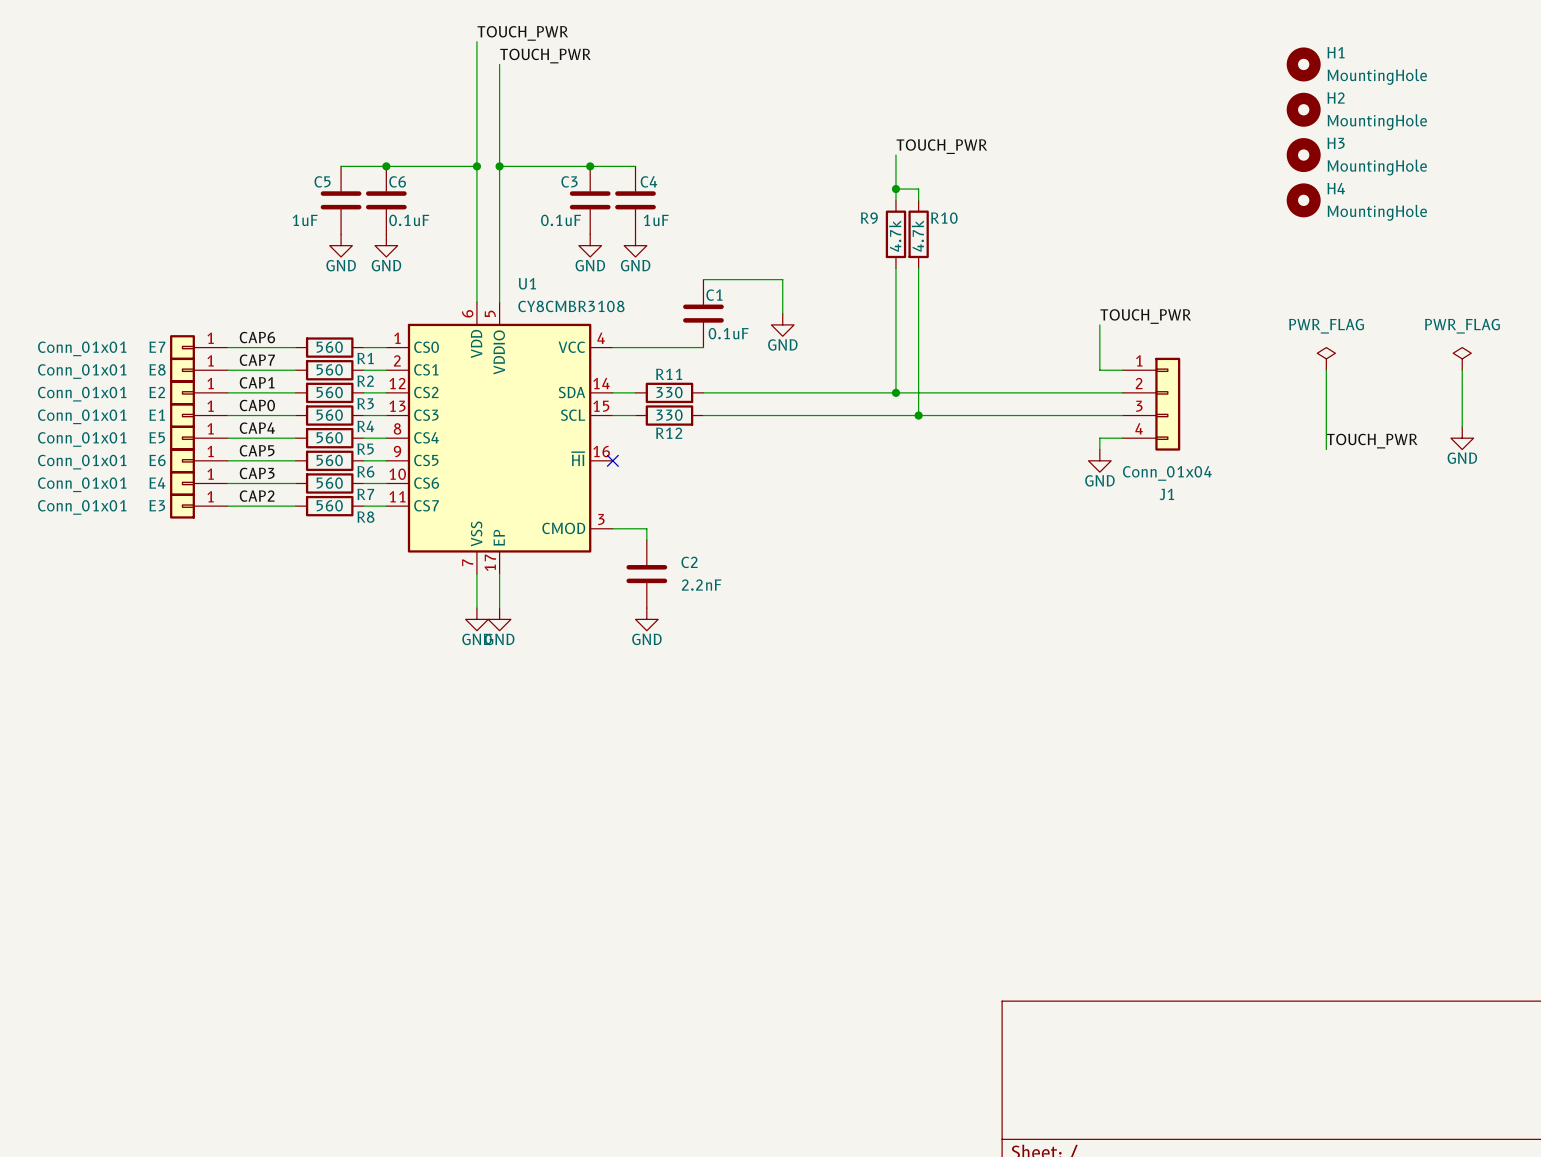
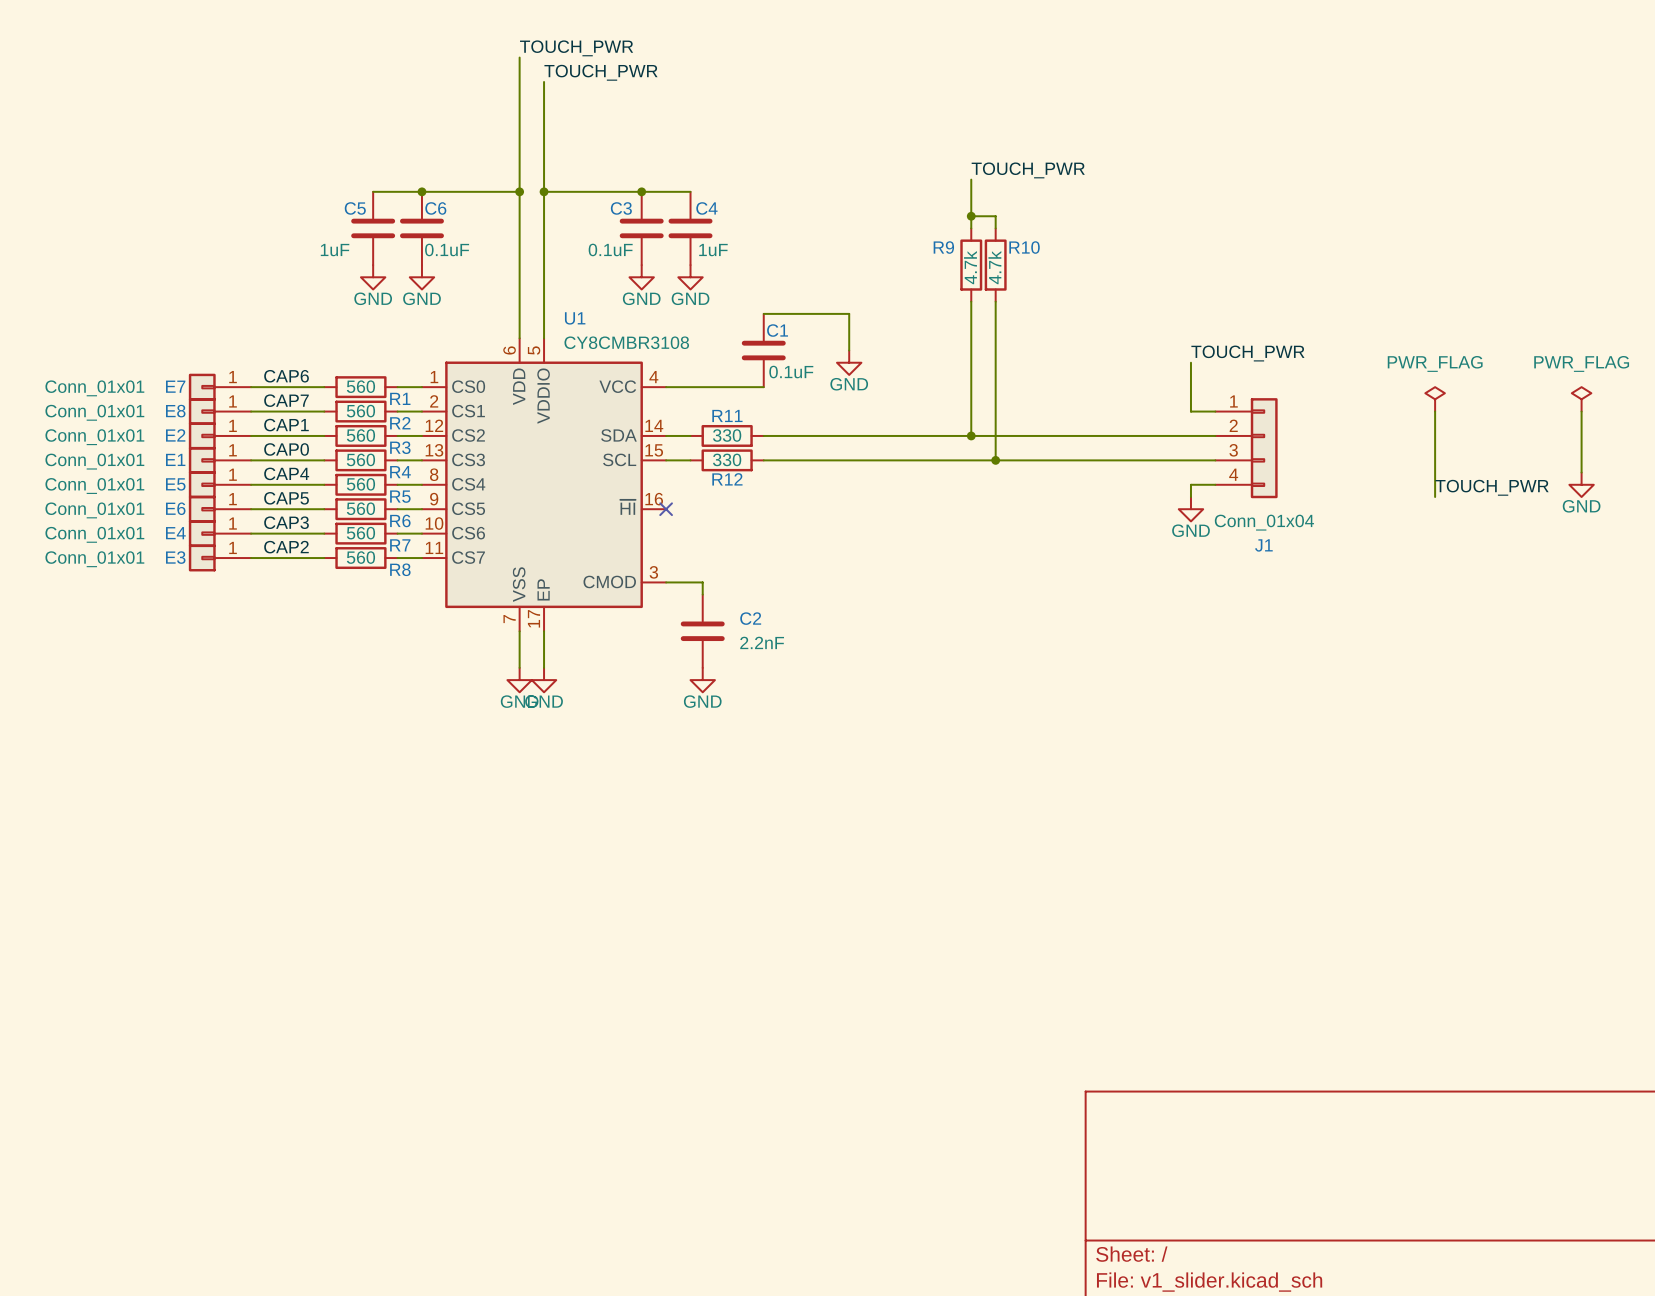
H1: MountingHole (1303, 64) -> none
H2: MountingHole (1303, 109) -> none
H3: MountingHole (1303, 155) -> none
H4: MountingHole (1303, 200) -> none

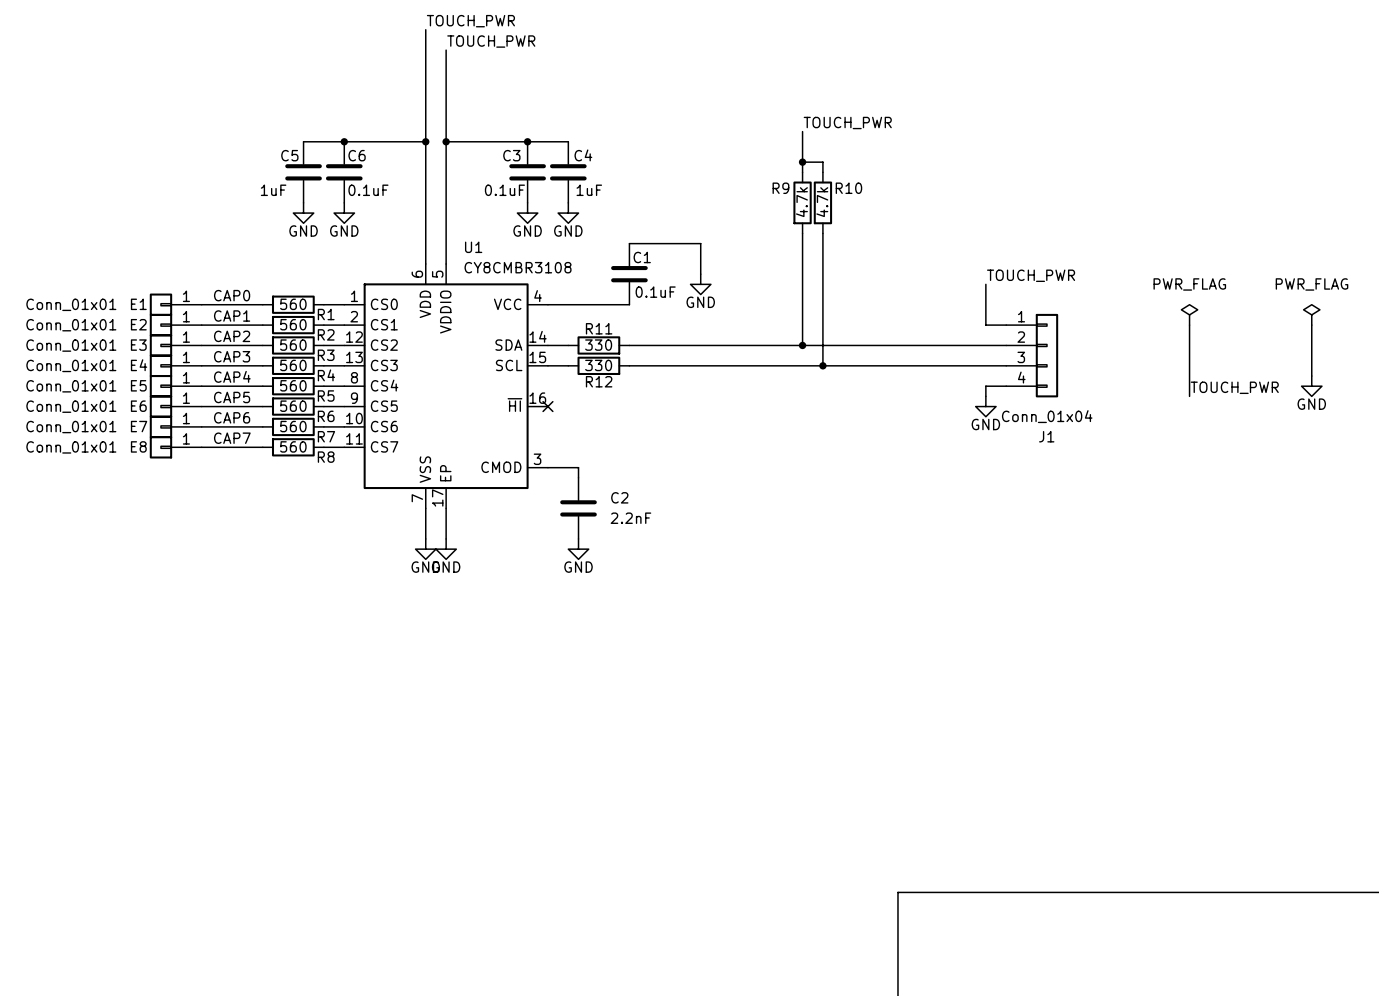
label: CAP6 (286, 376) -> CAP0 (232, 295)
E7 name: E7 (175, 386) -> E1 (138, 304)
label: CAP7 (286, 400) -> CAP1 (232, 316)
E8 name: E8 (175, 411) -> E2 (138, 324)
label: CAP1 (286, 425) -> CAP2 (232, 336)
E2 name: E2 (175, 435) -> E3 (138, 345)
label: CAP0 (286, 449) -> CAP3 (232, 356)
E1 name: E1 (175, 459) -> E4 (139, 365)
label: CAP3 (286, 522) -> CAP6 (232, 417)
E4 name: E4 (175, 533) -> E7 (139, 426)
label: CAP2 (286, 547) -> CAP7 (232, 438)
E3 name: E3 (175, 557) -> E8 (138, 446)

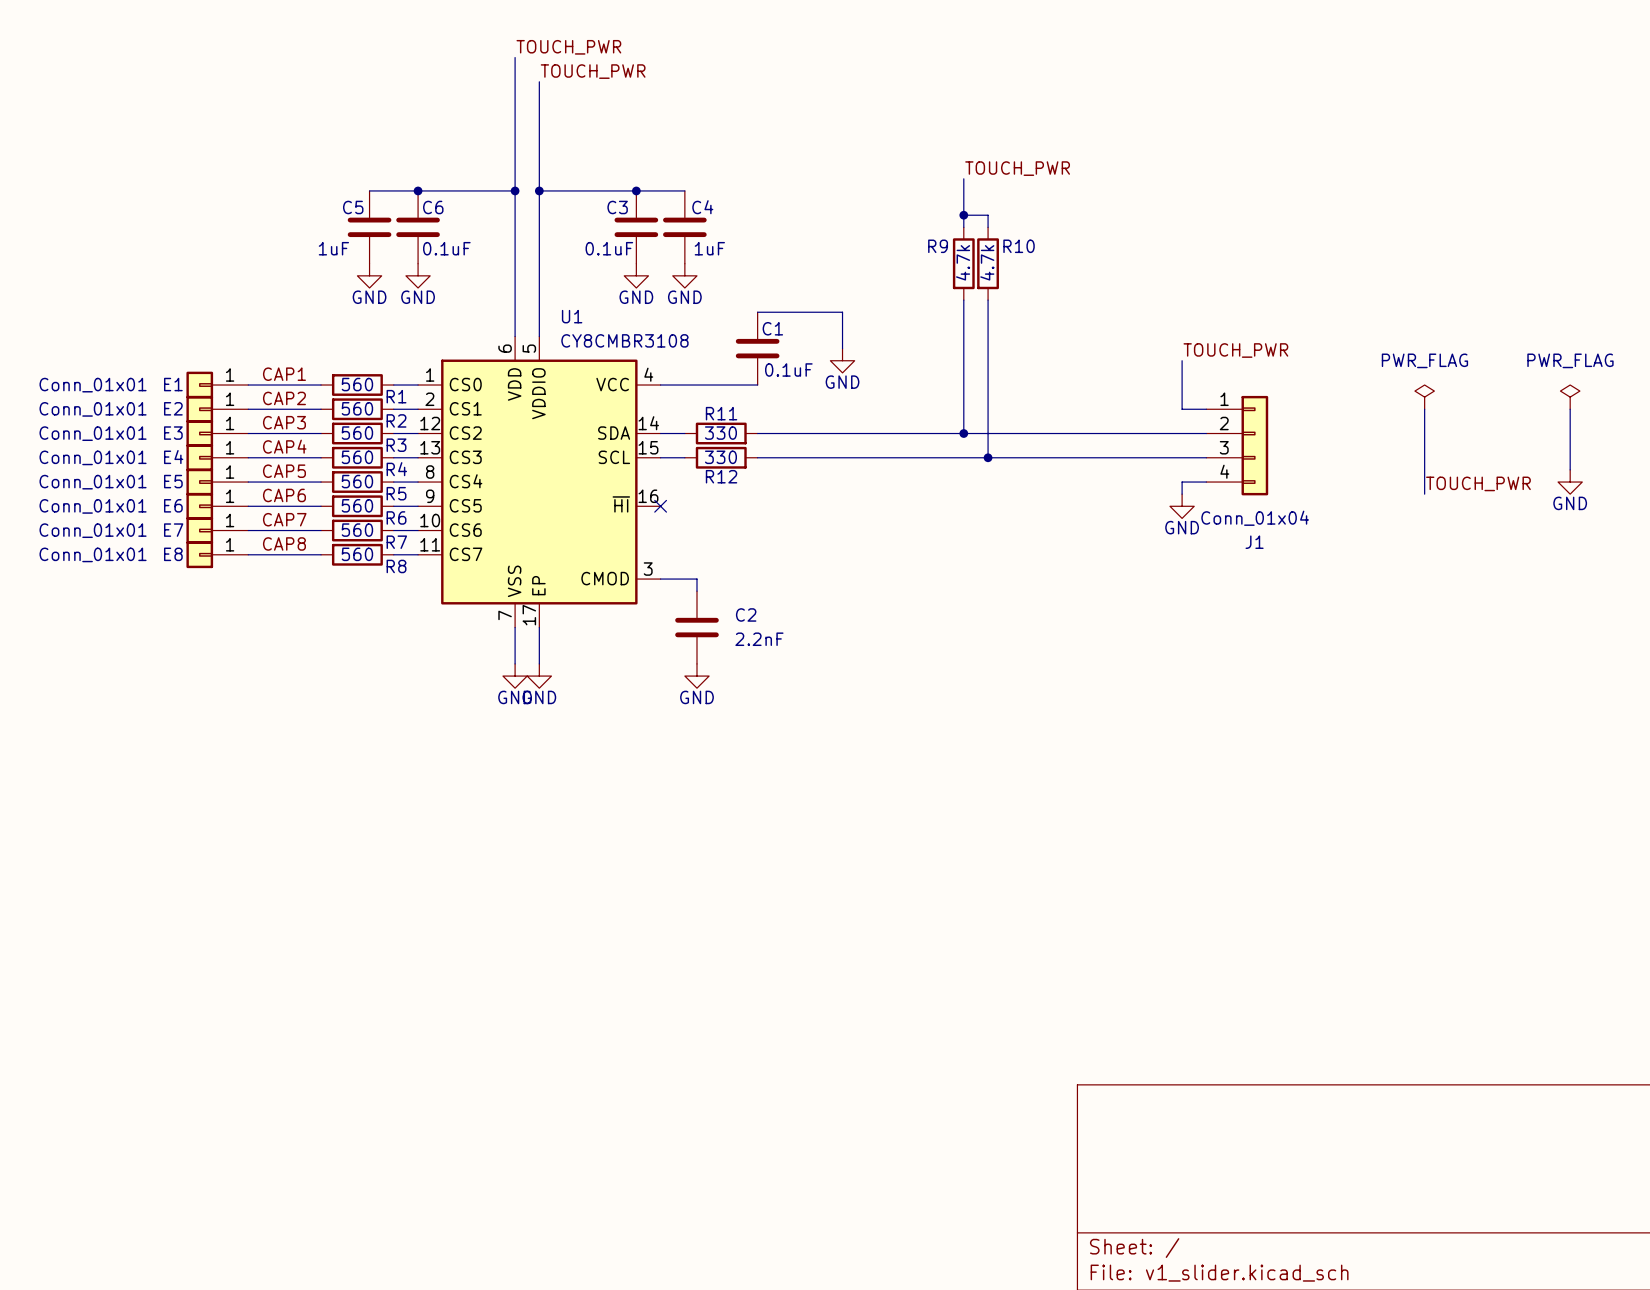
label: CAP0 (232, 295) -> CAP1 (284, 374)
label: CAP1 (232, 316) -> CAP2 (284, 398)
label: CAP2 (232, 336) -> CAP3 (284, 422)
label: CAP3 (232, 356) -> CAP4 (284, 446)
label: CAP4 (232, 376) -> CAP5 (284, 471)
label: CAP5 (232, 397) -> CAP6 (284, 495)
label: CAP6 (232, 417) -> CAP7 (284, 519)
label: CAP7 (232, 438) -> CAP8 (284, 543)

